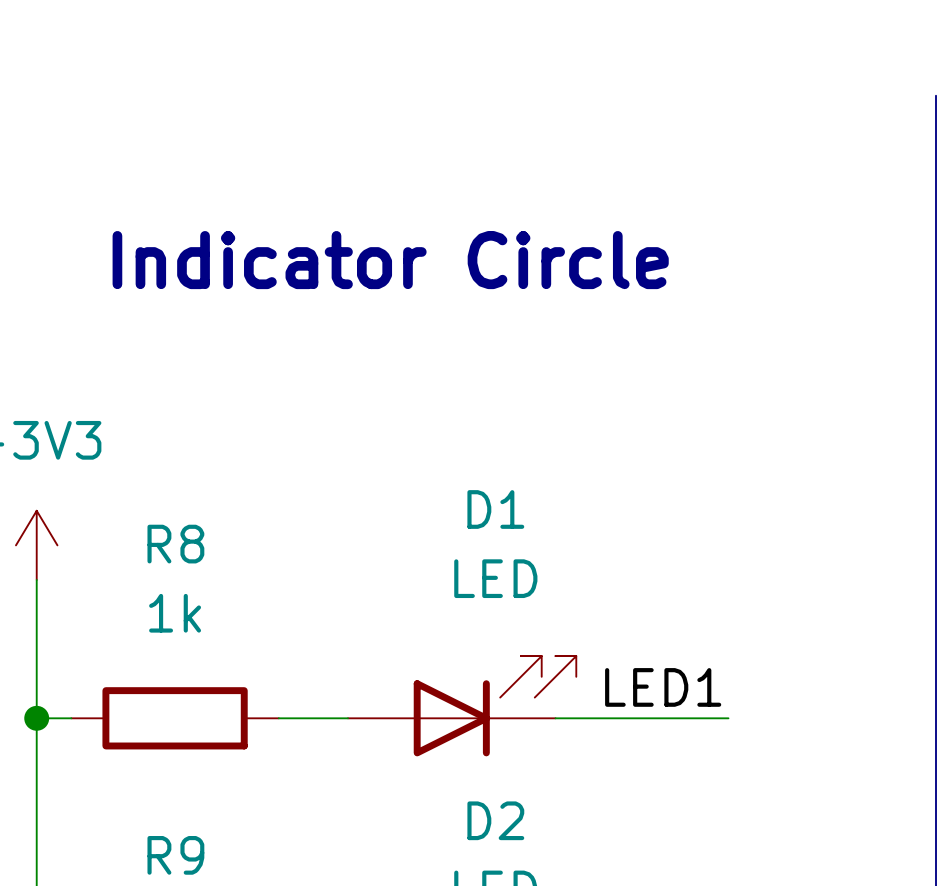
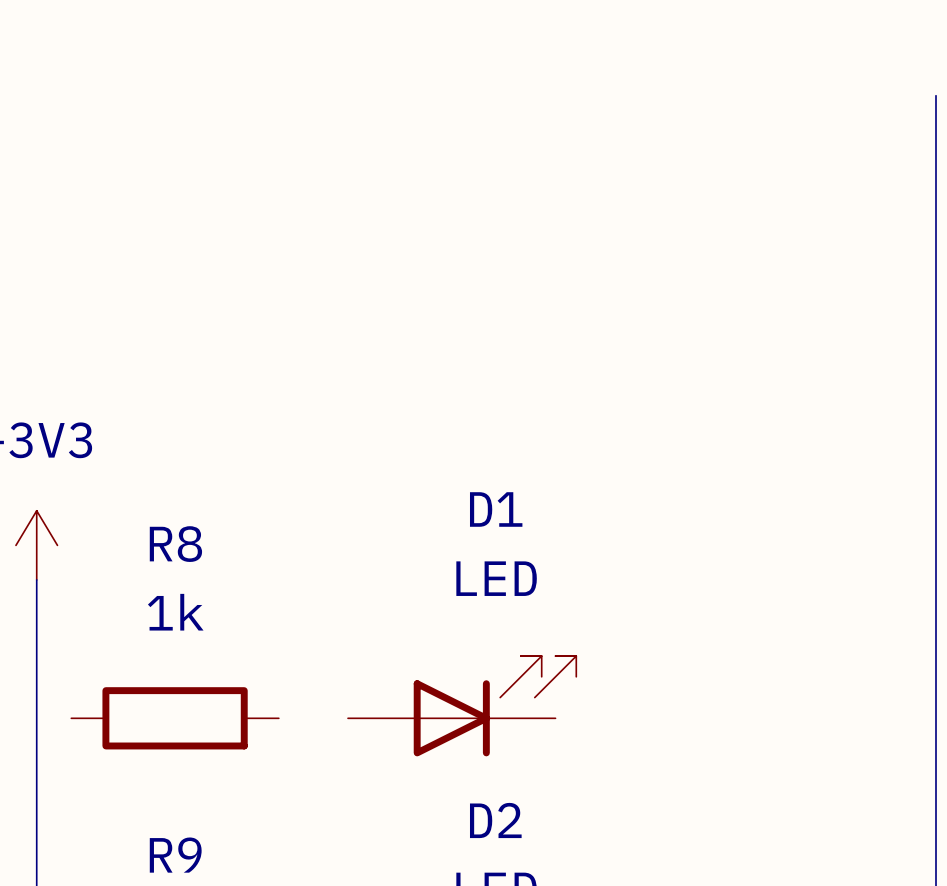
text: Indicator Circle (390, 260) -> none
label: LED1 (663, 687) -> none
wire: (36, 718) (71, 718) -> none
junction: (36, 718) -> none
wire: (278, 718) (348, 718) -> none
wire: (555, 718) (728, 718) -> none

